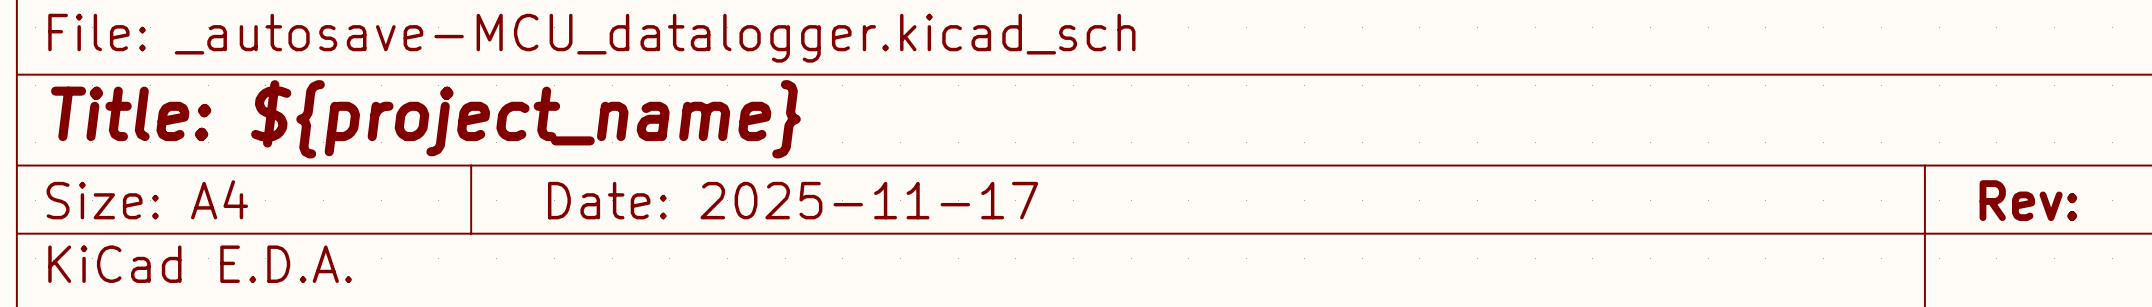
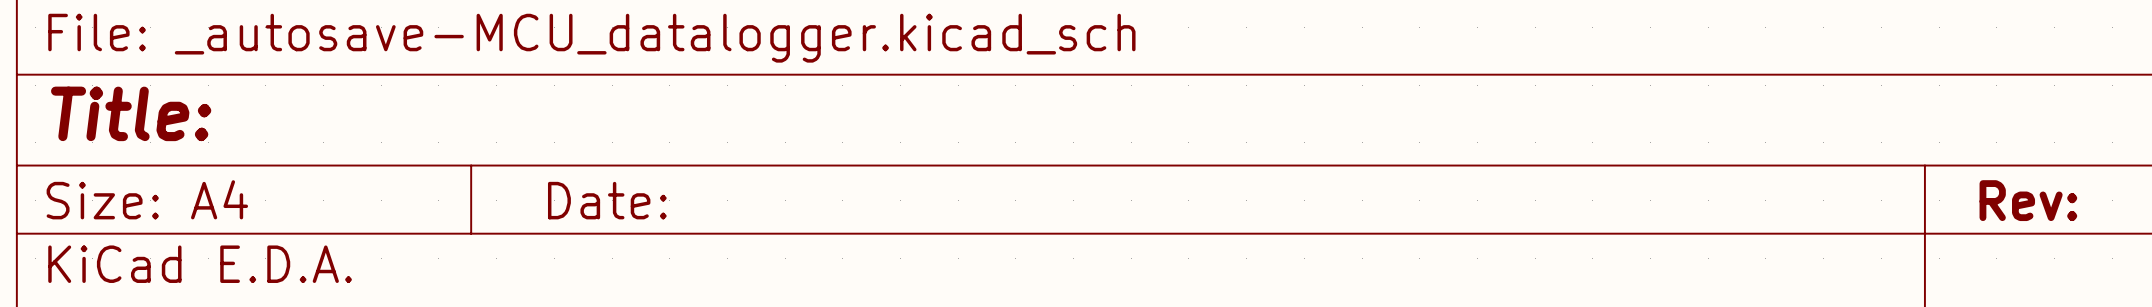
title block: Title: ${project_name} (425, 119) -> Title: (131, 113)
title block: Date: 2025-11-17 (793, 200) -> Date: (607, 200)

